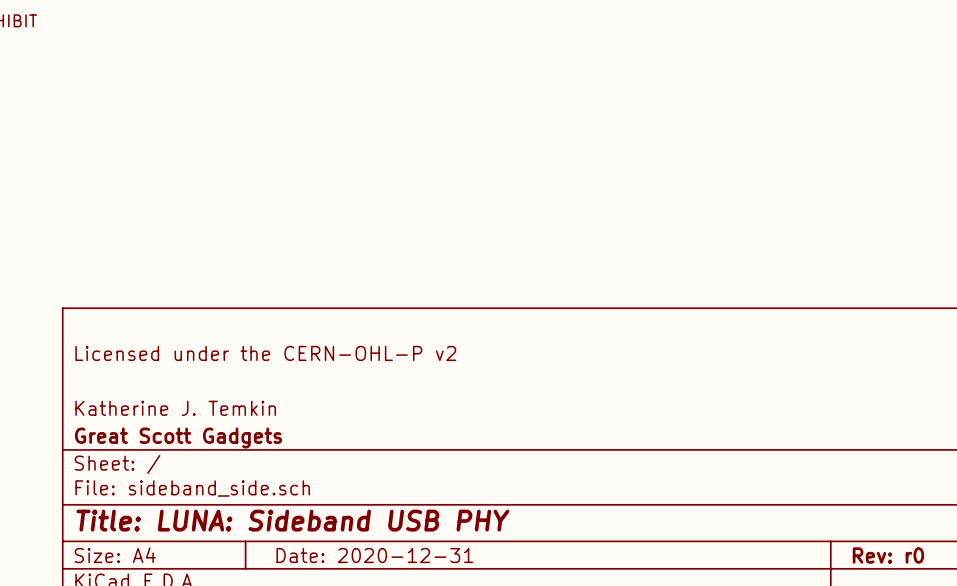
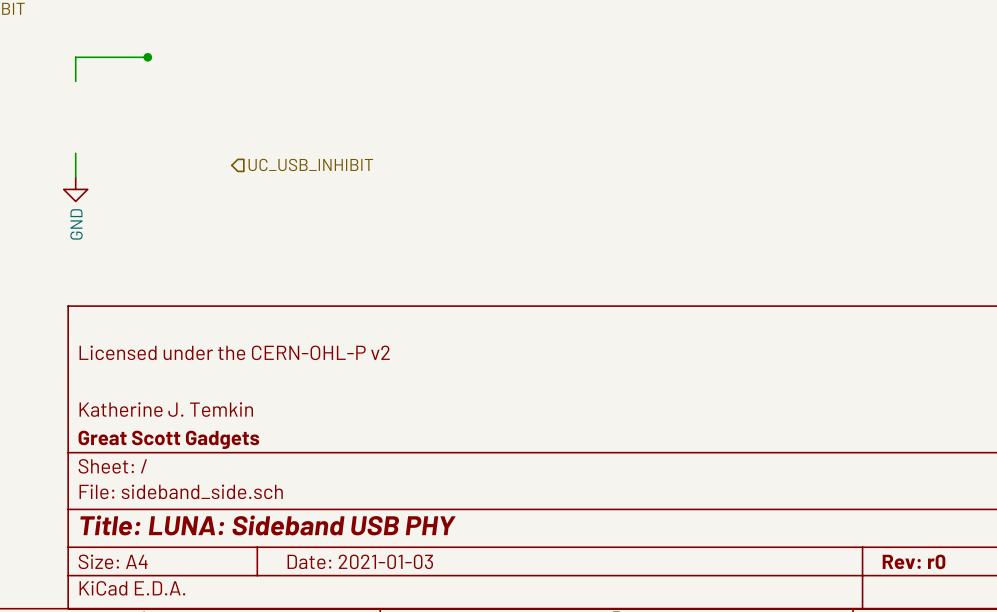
wire: none -> (147, 57) (75, 57) (75, 81)
junction: none -> (147, 57)
wire: none -> (75, 153) (75, 177)
hierarchical label: none -> UC_USB_INHIBIT (310, 164)
power symbol: none -> GND (75, 189)
title block: Date: 2020-12-31 (374, 555) -> Date: 2021-01-03 (360, 561)

